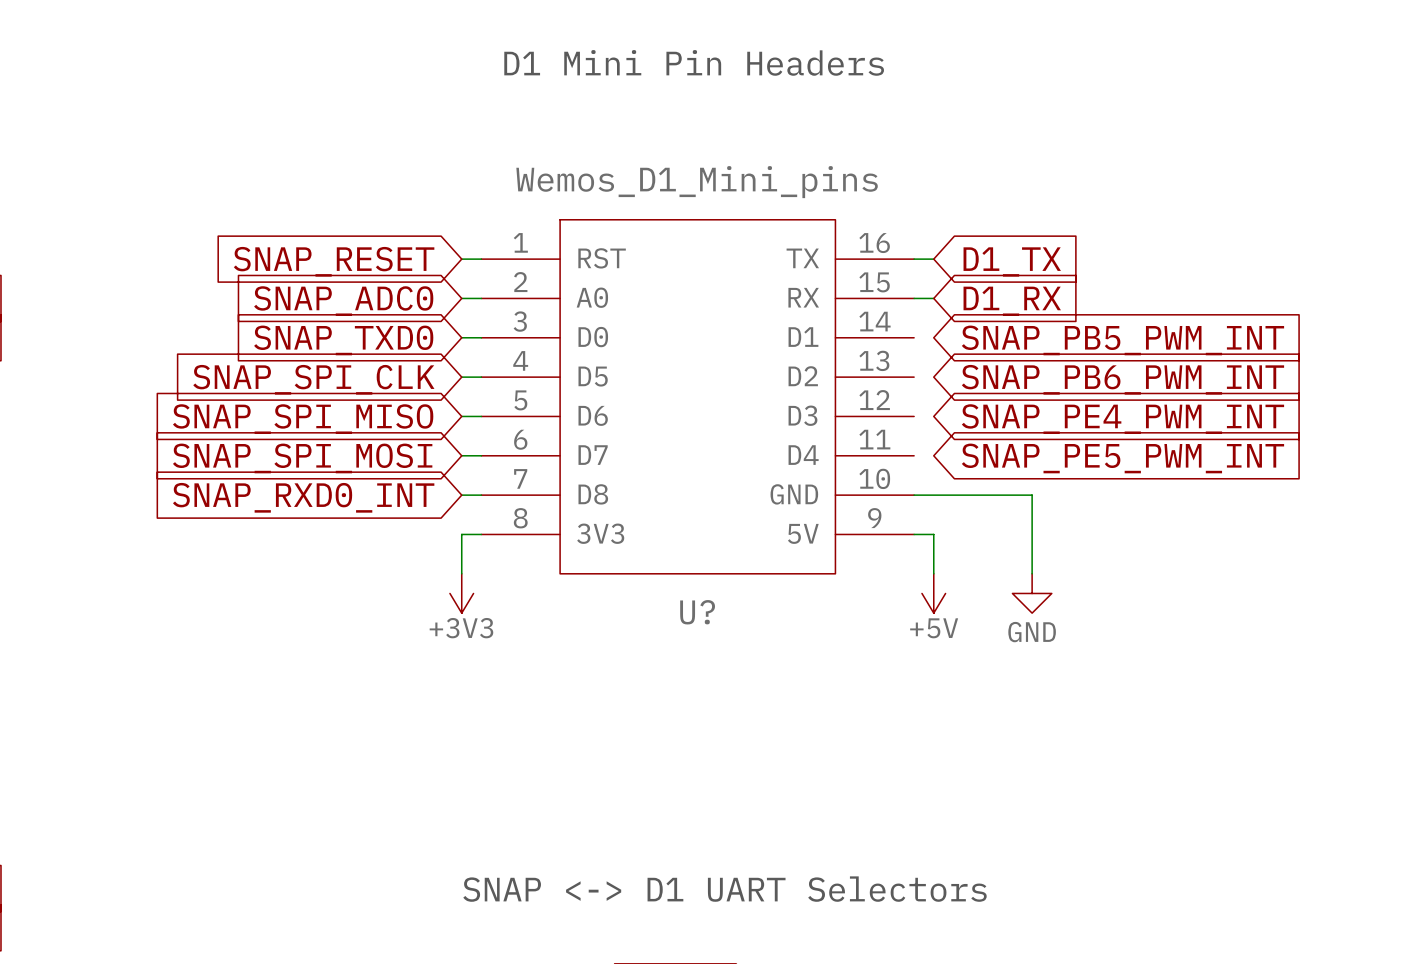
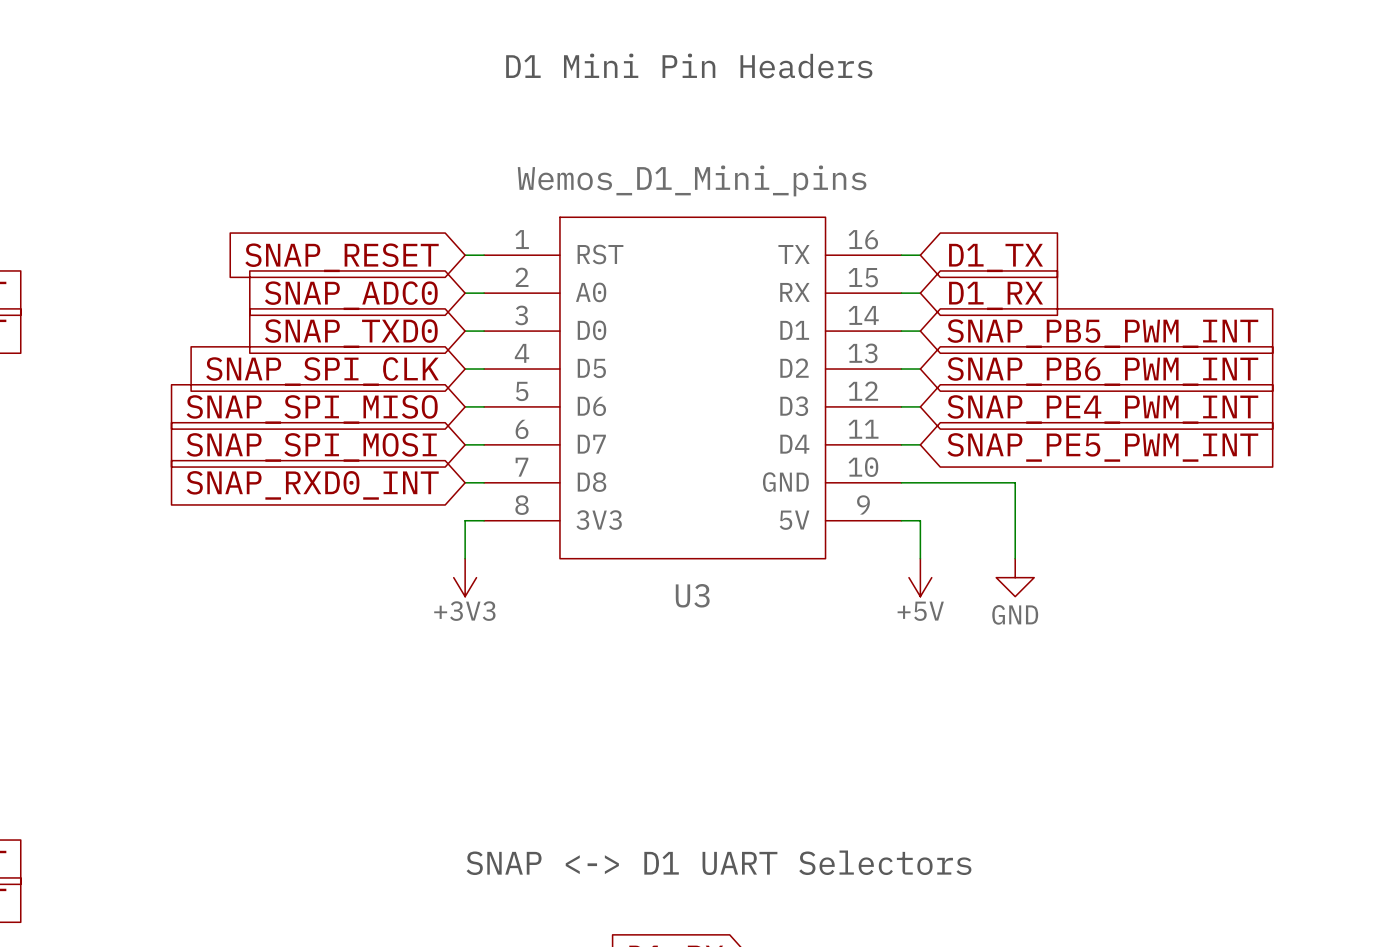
wire: none -> (901, 331) (920, 331)
wire: none -> (901, 369) (920, 369)
wire: none -> (901, 406) (920, 406)
wire: none -> (901, 444) (920, 444)
U? name: U? (697, 612) -> U3 (692, 595)

